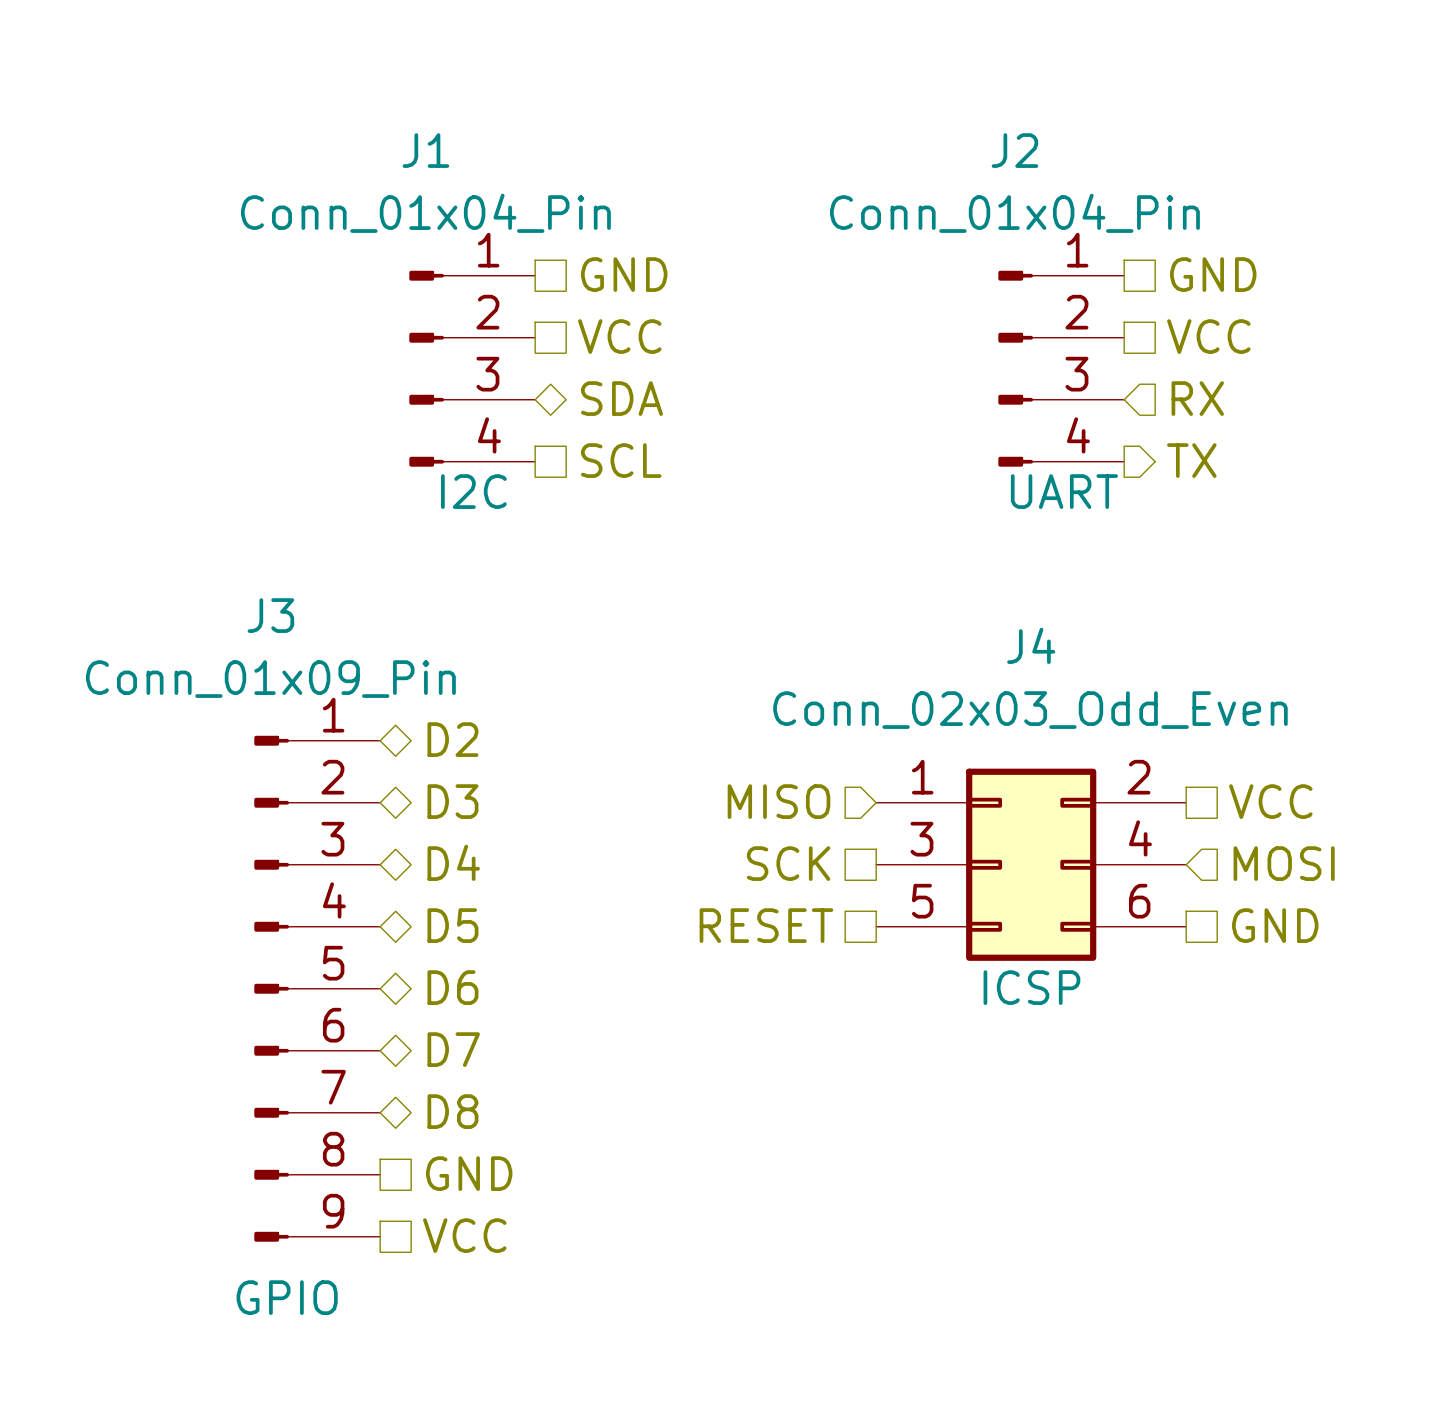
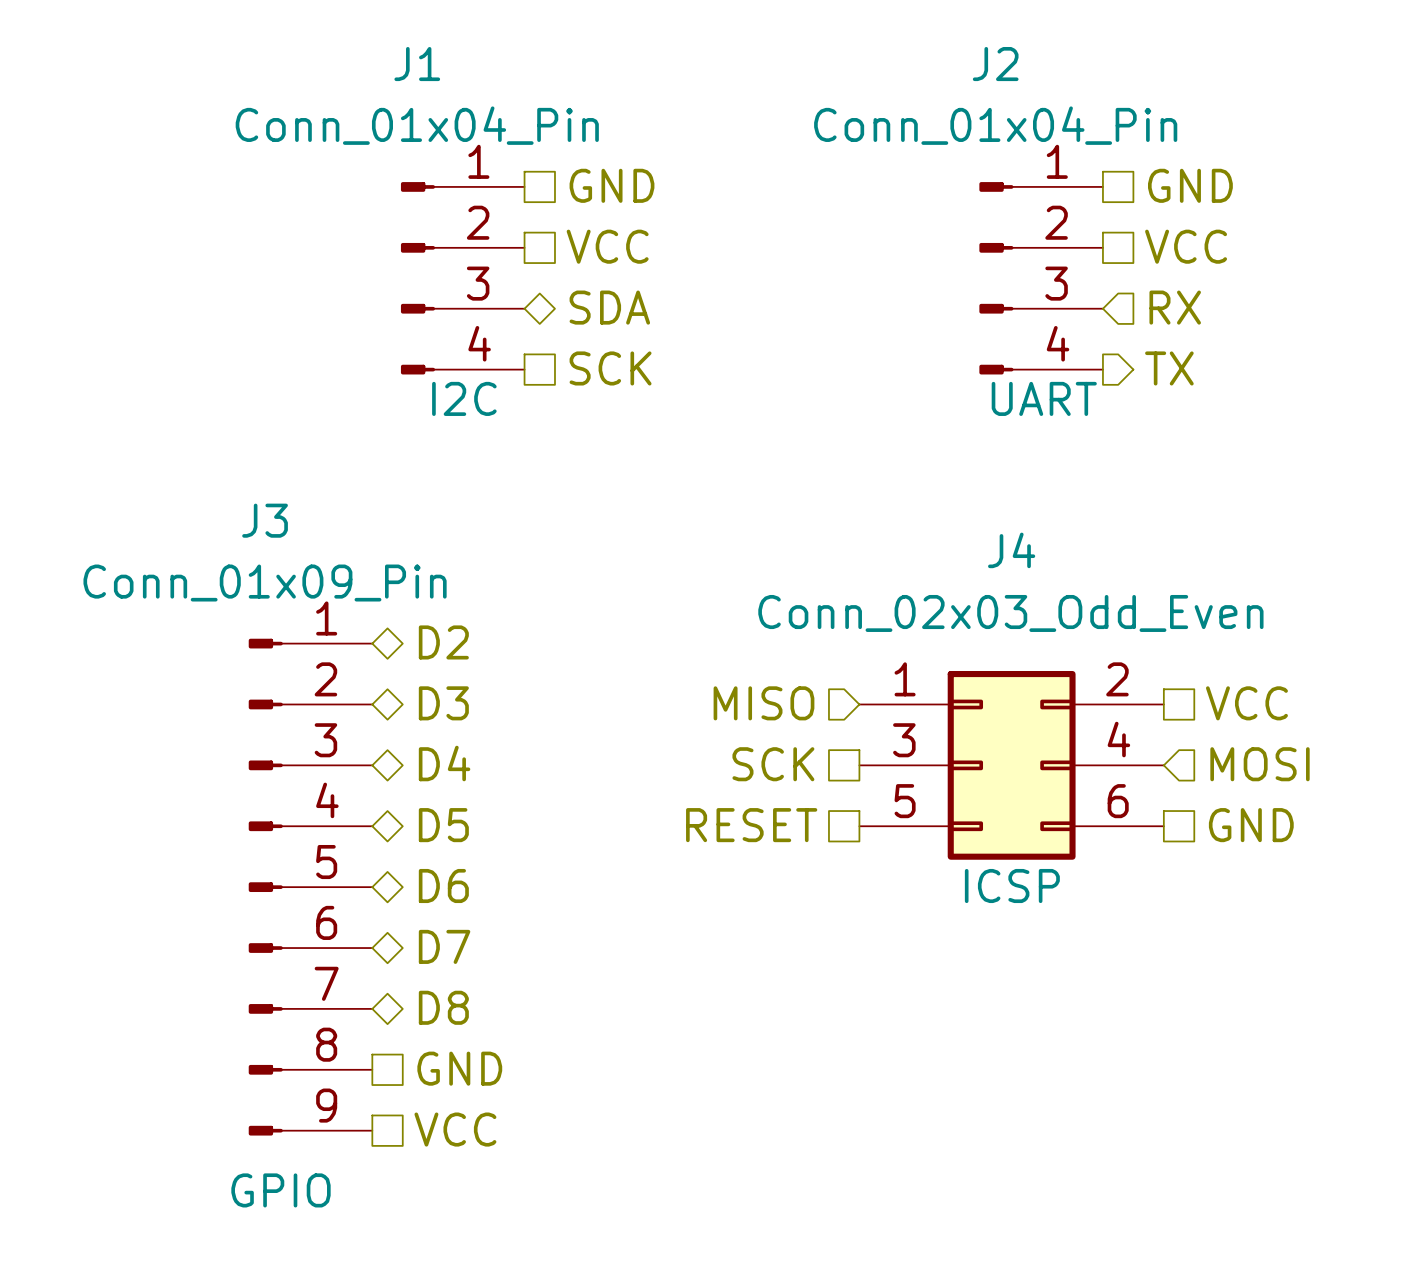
hierarchical label: SCL (621, 460) -> SCK (610, 368)

